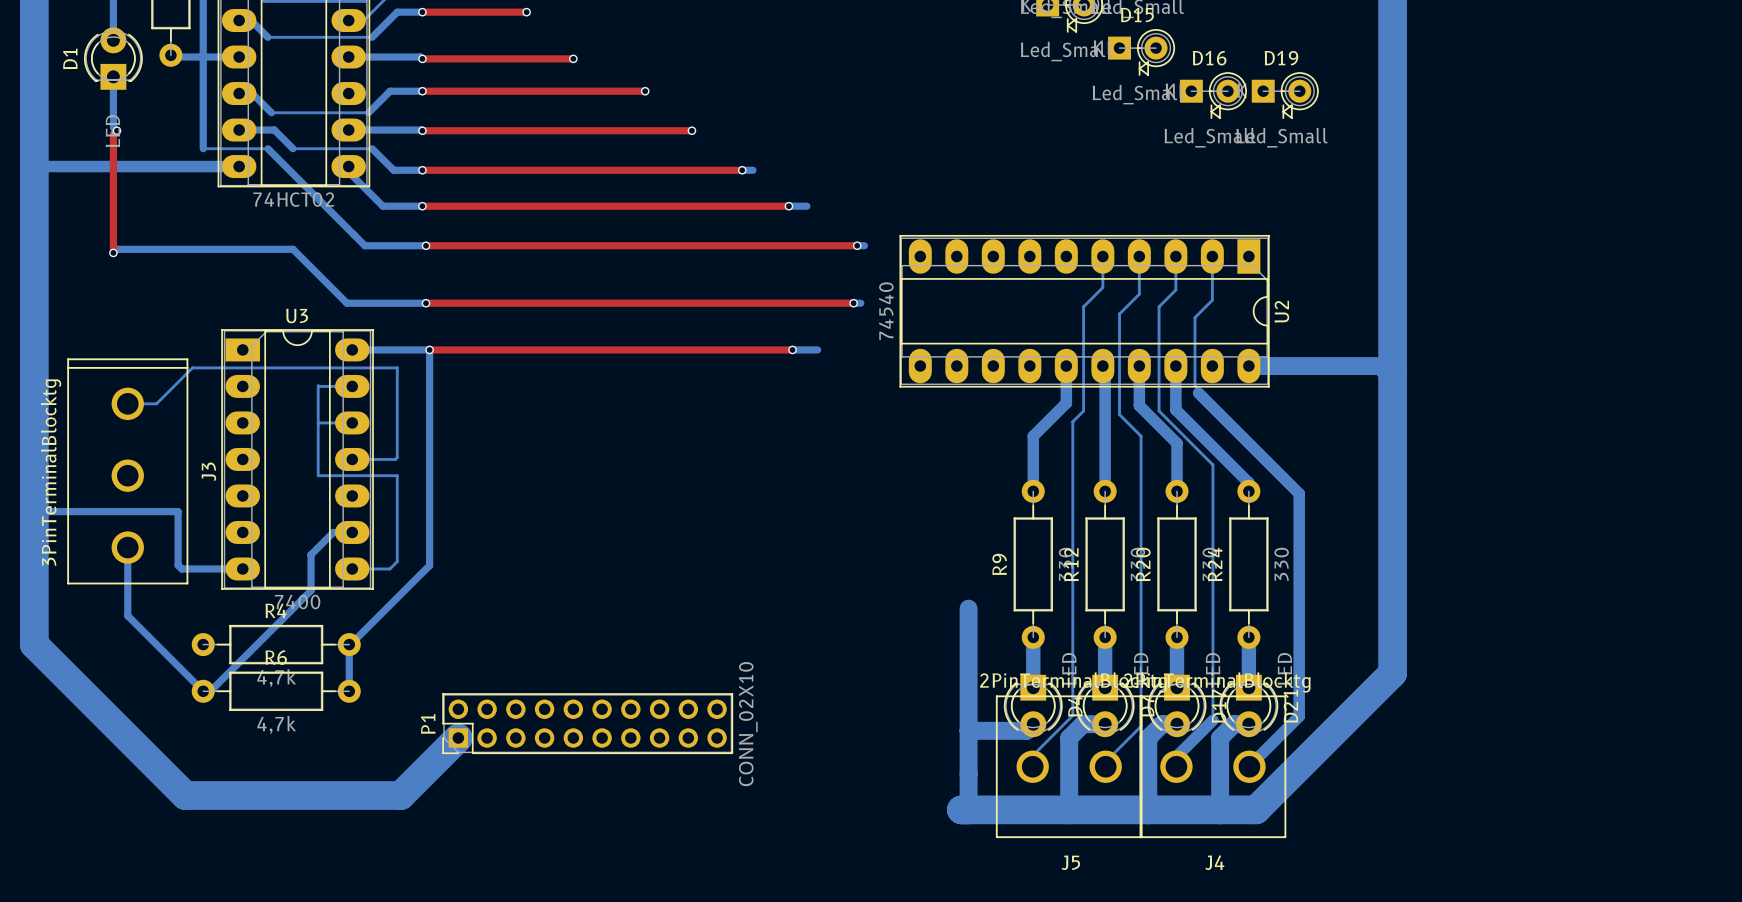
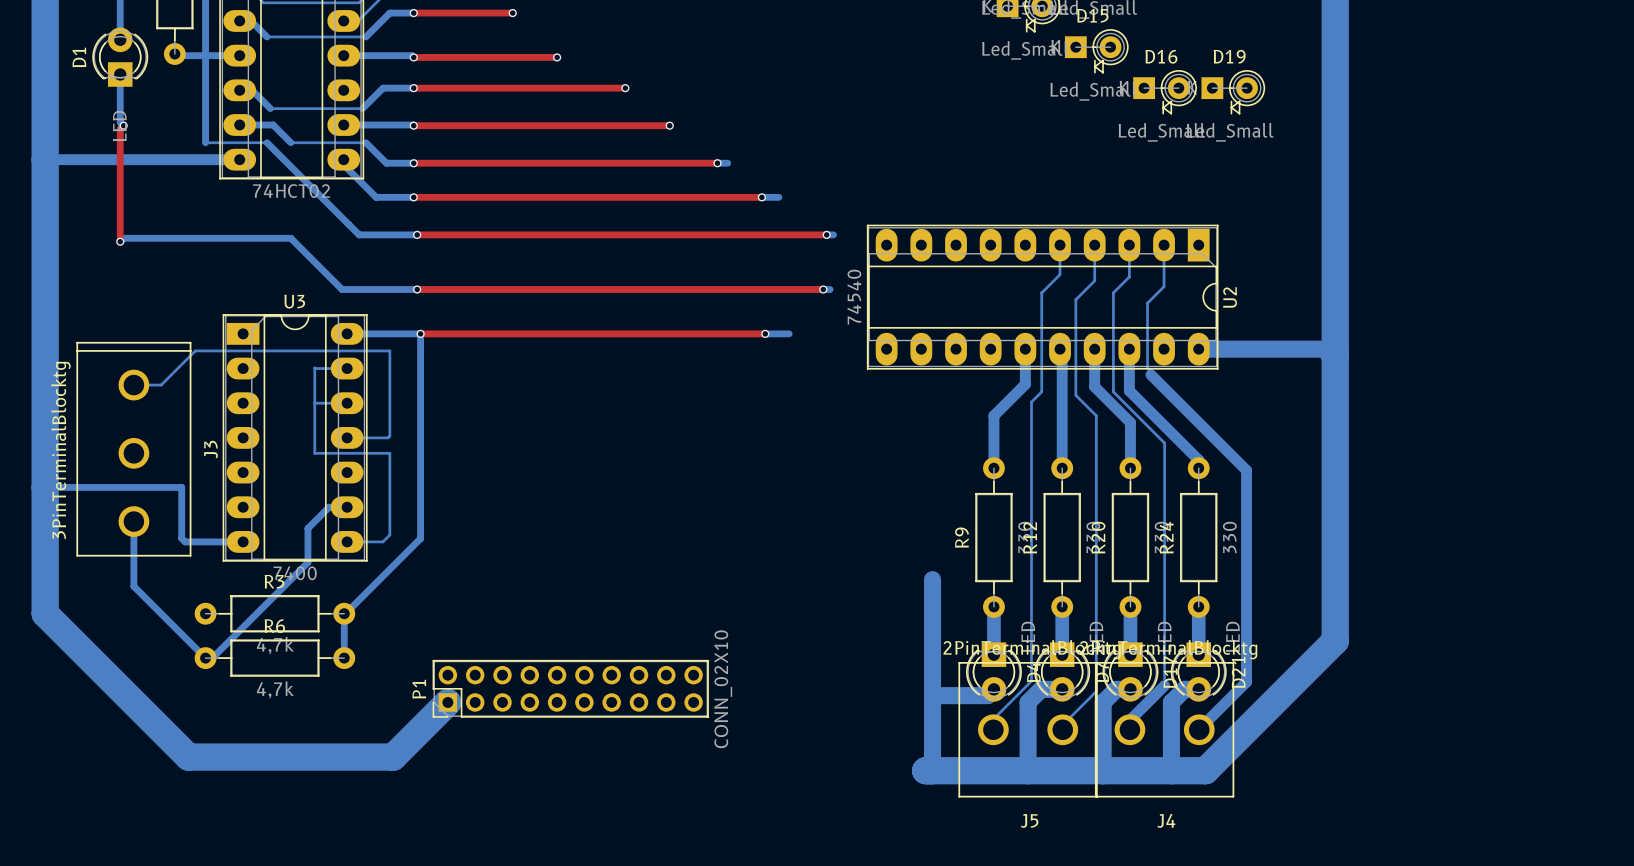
R4 name: R4 (276, 610) -> R3 (274, 581)

